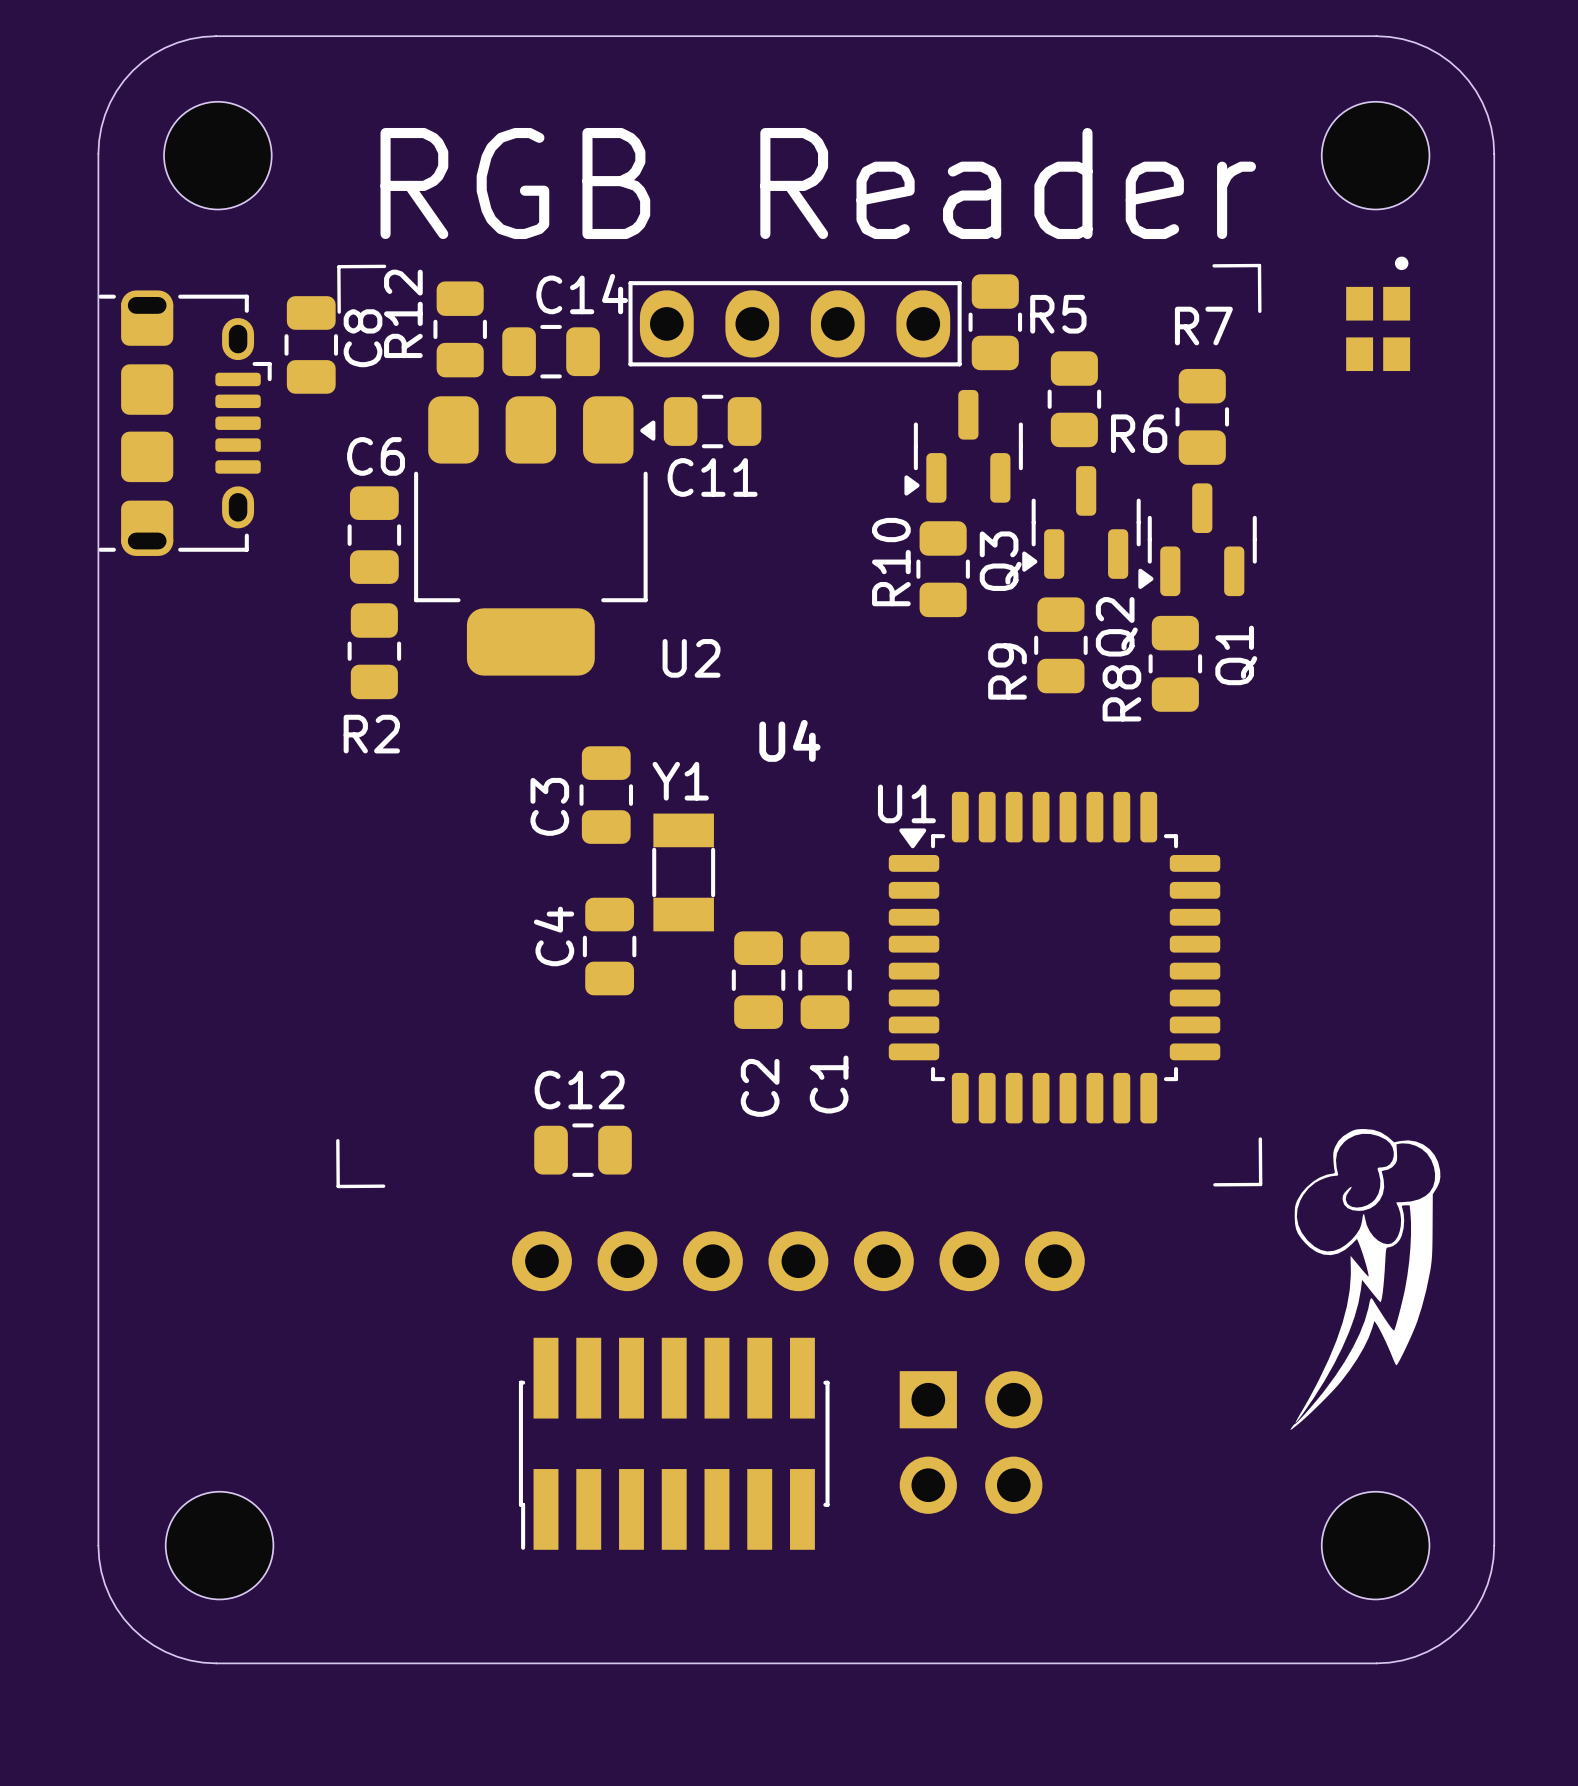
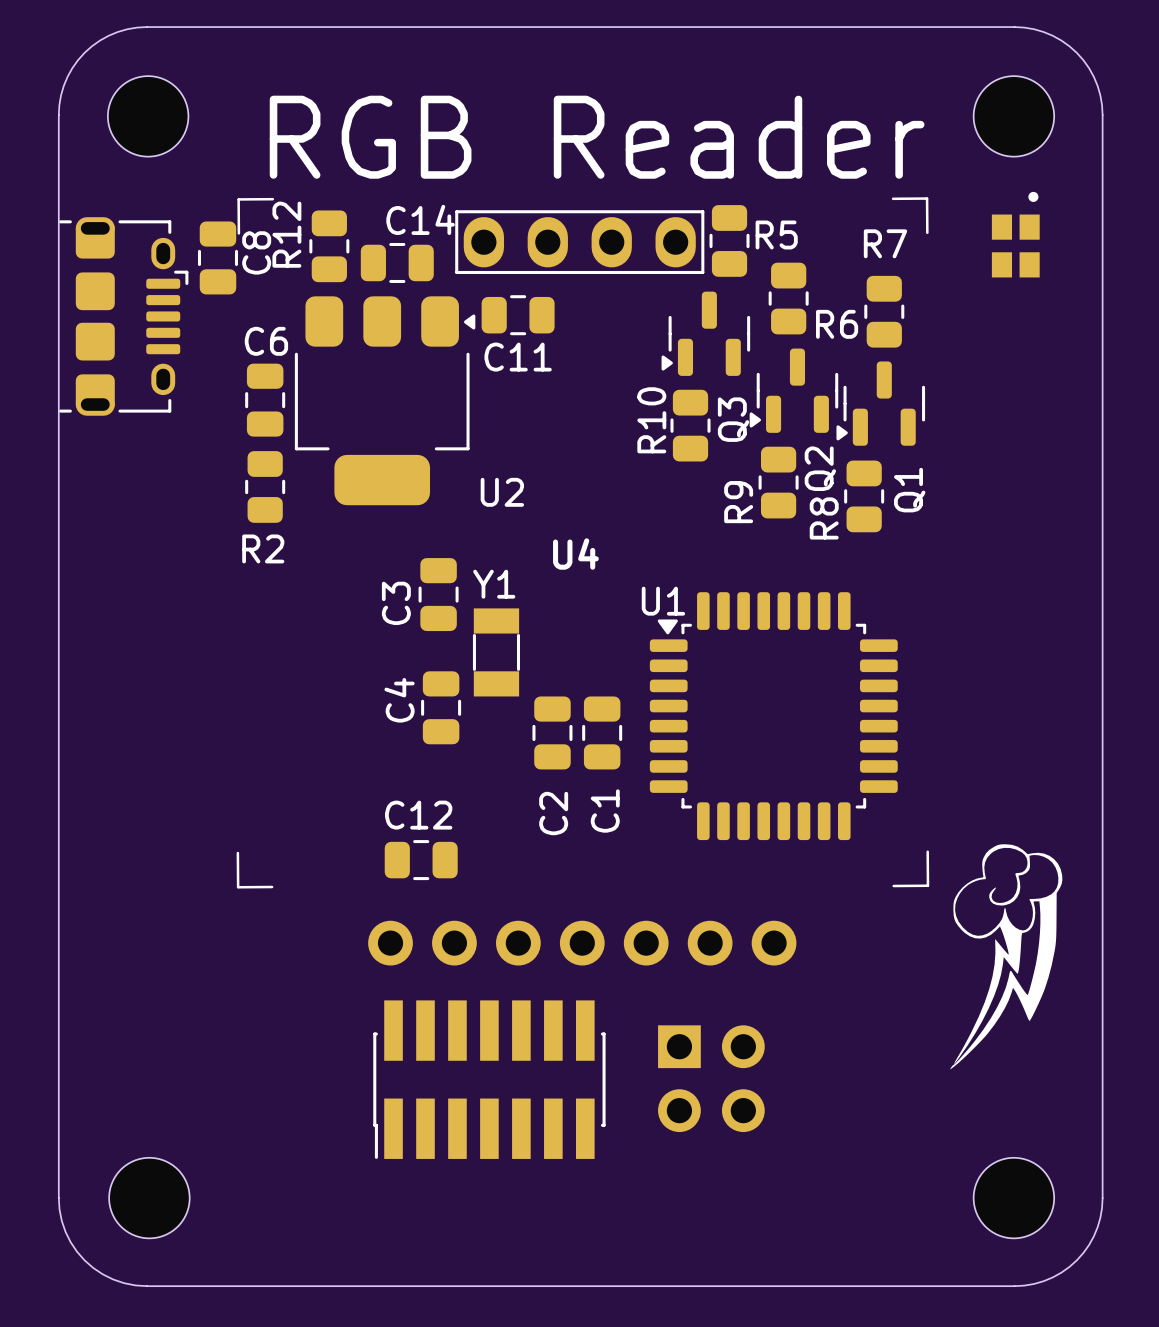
board edge: (98, 1545) (105, 1584) (116, 1608) (132, 1628) (165, 1651) (189, 1660) (216, 1663) (1389, 1662) (1427, 1651) (1459, 1628) (1482, 1596) (1491, 1571) (1494, 1545) -> (58, 1155) (59, 1209) (65, 1231) (77, 1251) (93, 1267) (113, 1279) (135, 1285) (146, 1286) (1024, 1285) (1043, 1281) (1061, 1272) (1076, 1260) (1089, 1244) (1097, 1227) (1102, 1207) (1102, 1155)
part position: (219, 1545) -> (149, 1198)
part position: (1375, 1545) -> (1013, 1198)

